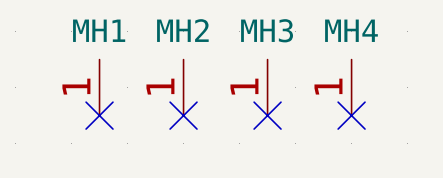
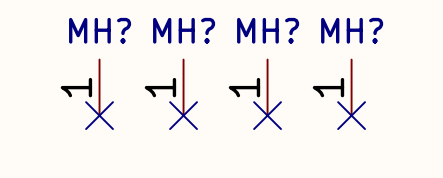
MH1 name: MH1 (99, 30) -> MH? (100, 30)
MH2 name: MH2 (182, 30) -> MH? (184, 30)
MH3 name: MH3 (267, 30) -> MH? (268, 30)
MH4 name: MH4 (351, 30) -> MH? (352, 30)

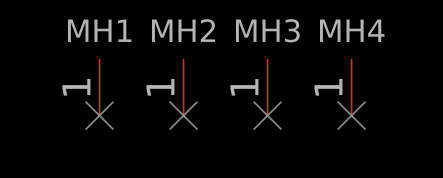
MH? name: MH? (100, 30) -> MH1 (99, 30)
MH? name: MH? (184, 30) -> MH2 (183, 30)
MH? name: MH? (268, 30) -> MH3 (267, 30)
MH? name: MH? (352, 30) -> MH4 (352, 30)

